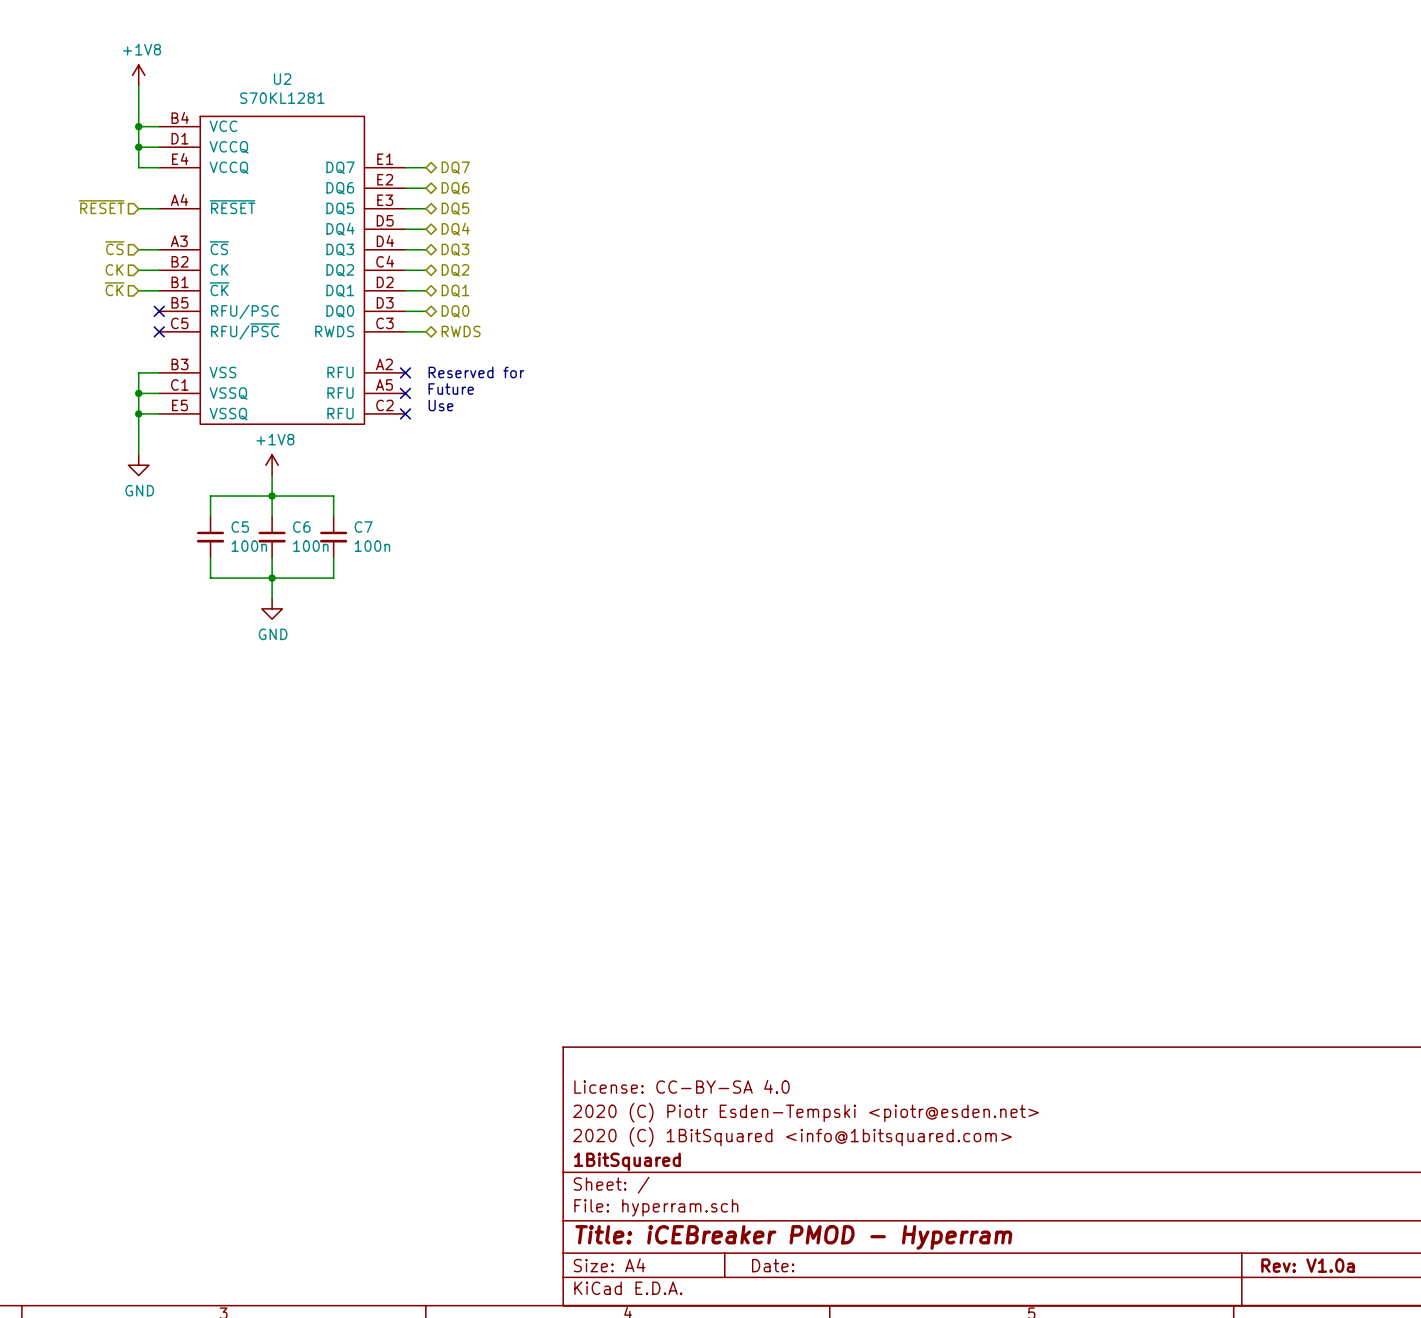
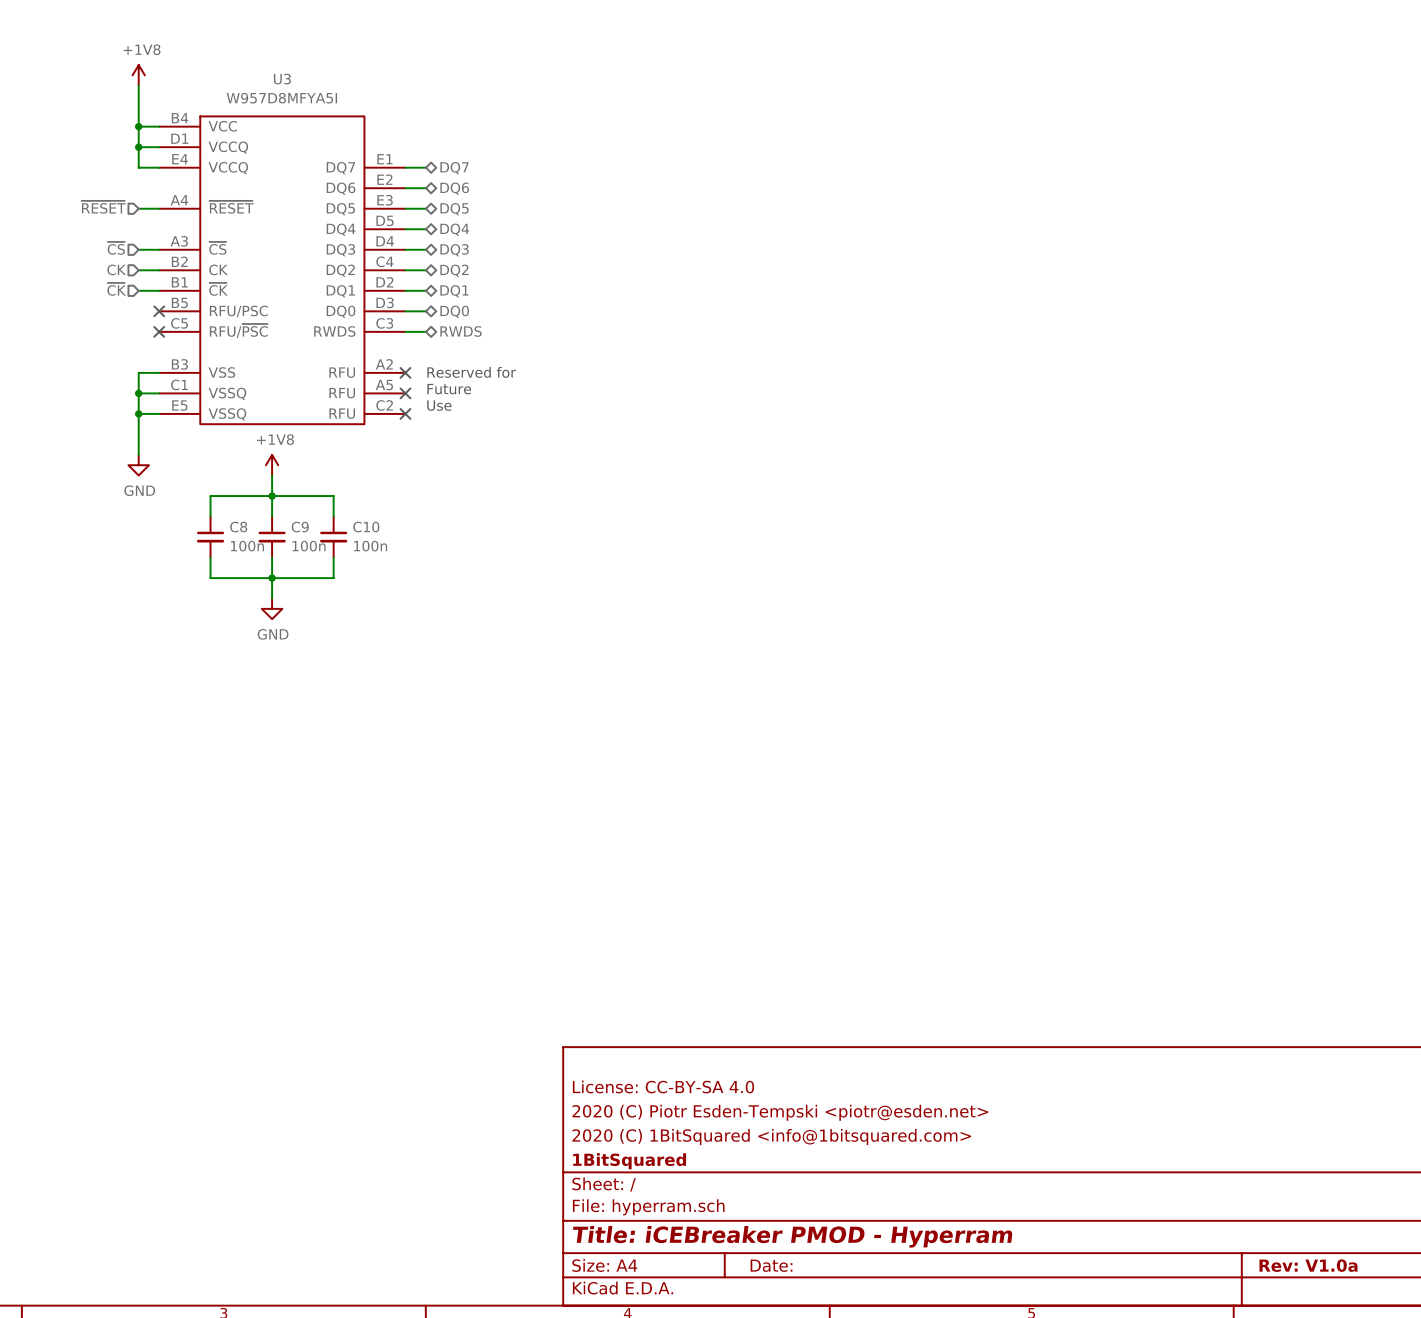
U2 name: U2 (282, 79) -> U3 (282, 79)
U2 value: S70KL1281 (282, 98) -> W957D8MFYA5I (281, 98)
C5 name: C5 (240, 527) -> C8 (238, 527)
C6 name: C6 (301, 527) -> C9 (300, 527)
C7 name: C7 (363, 527) -> C10 (366, 527)

